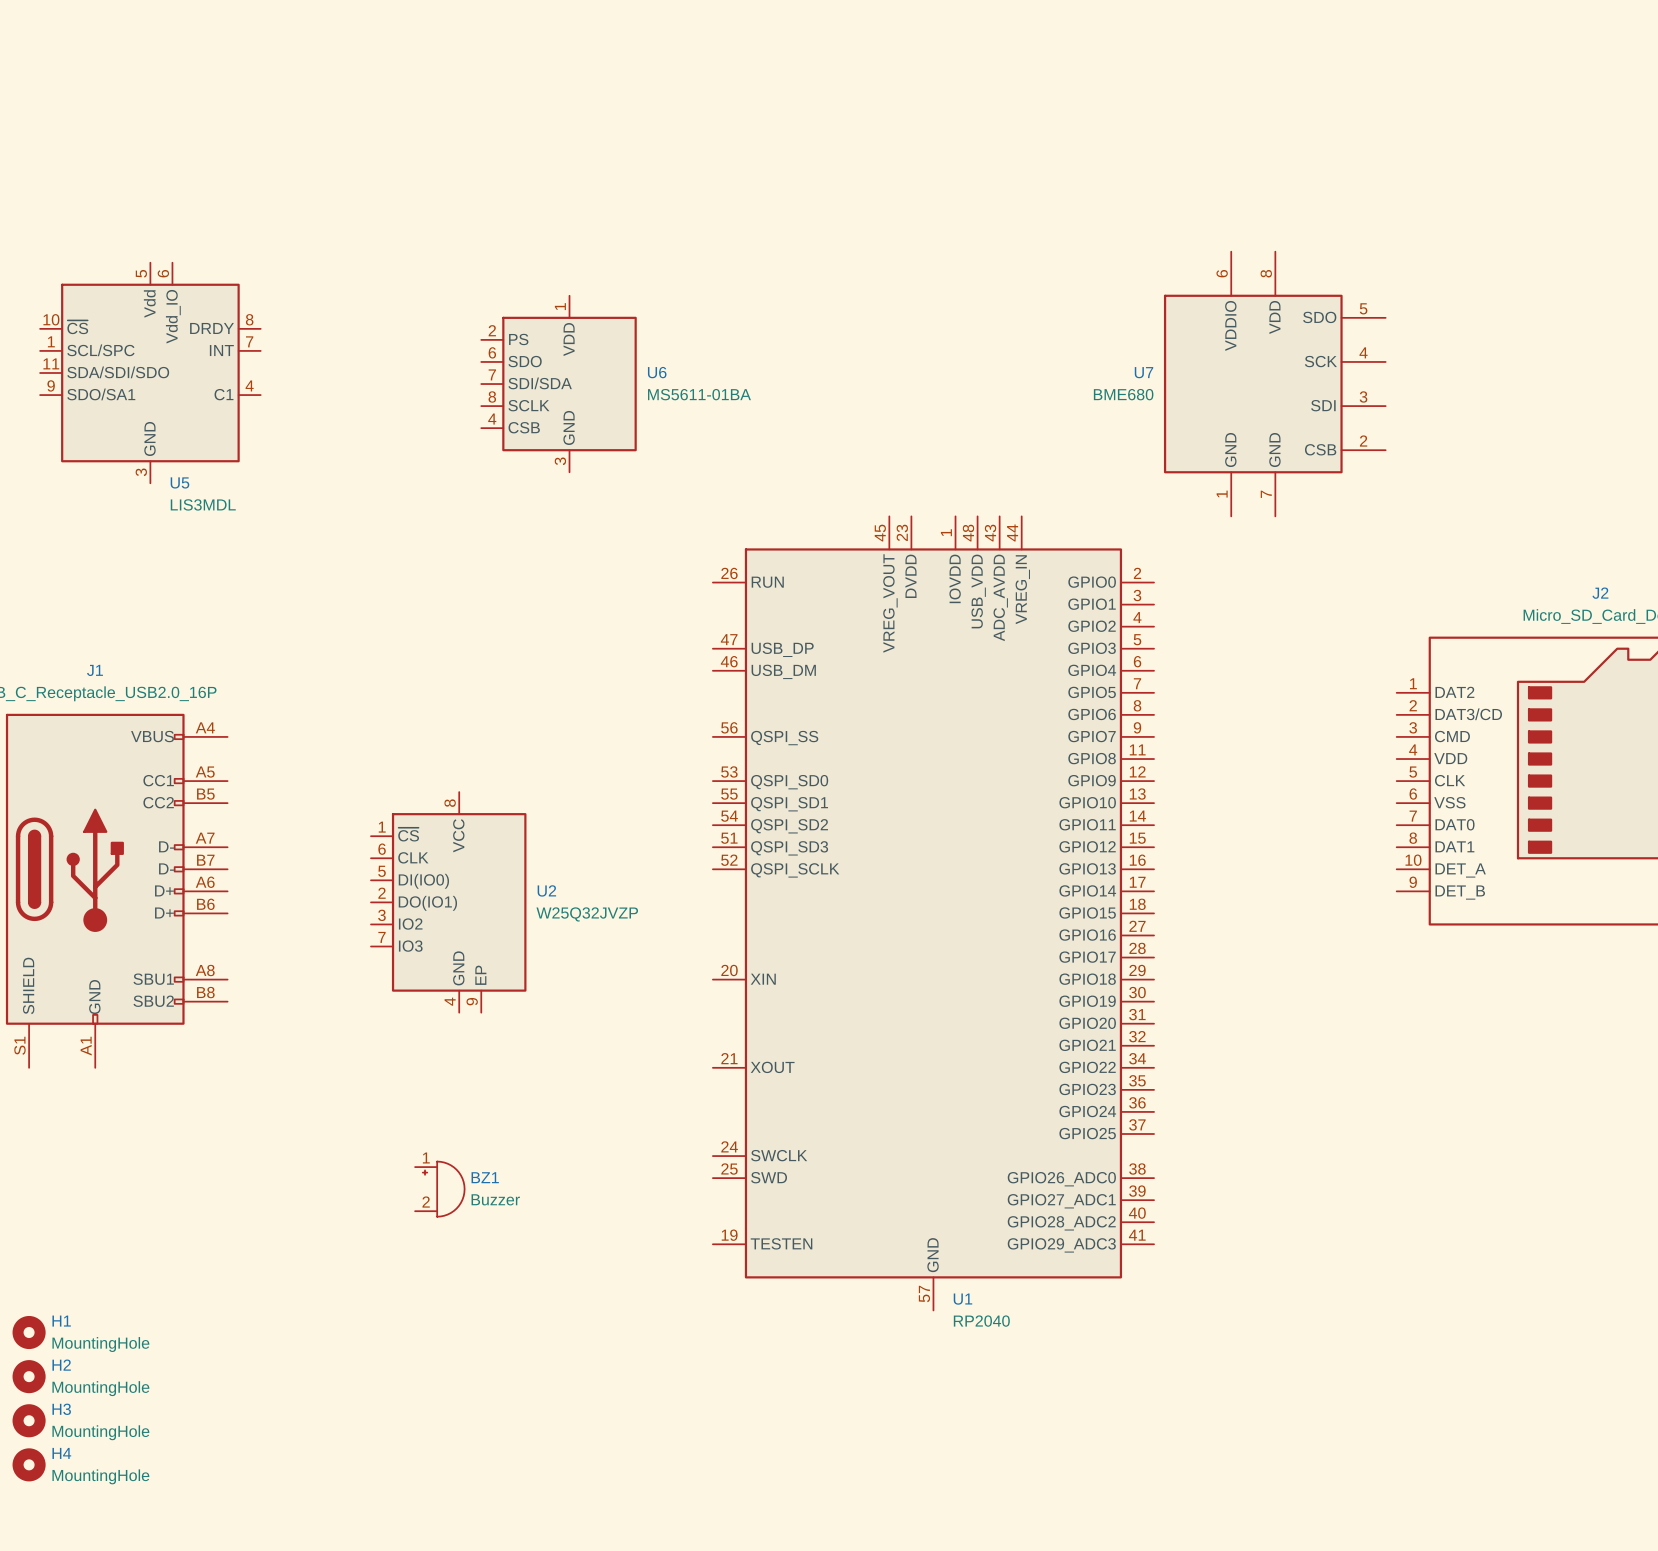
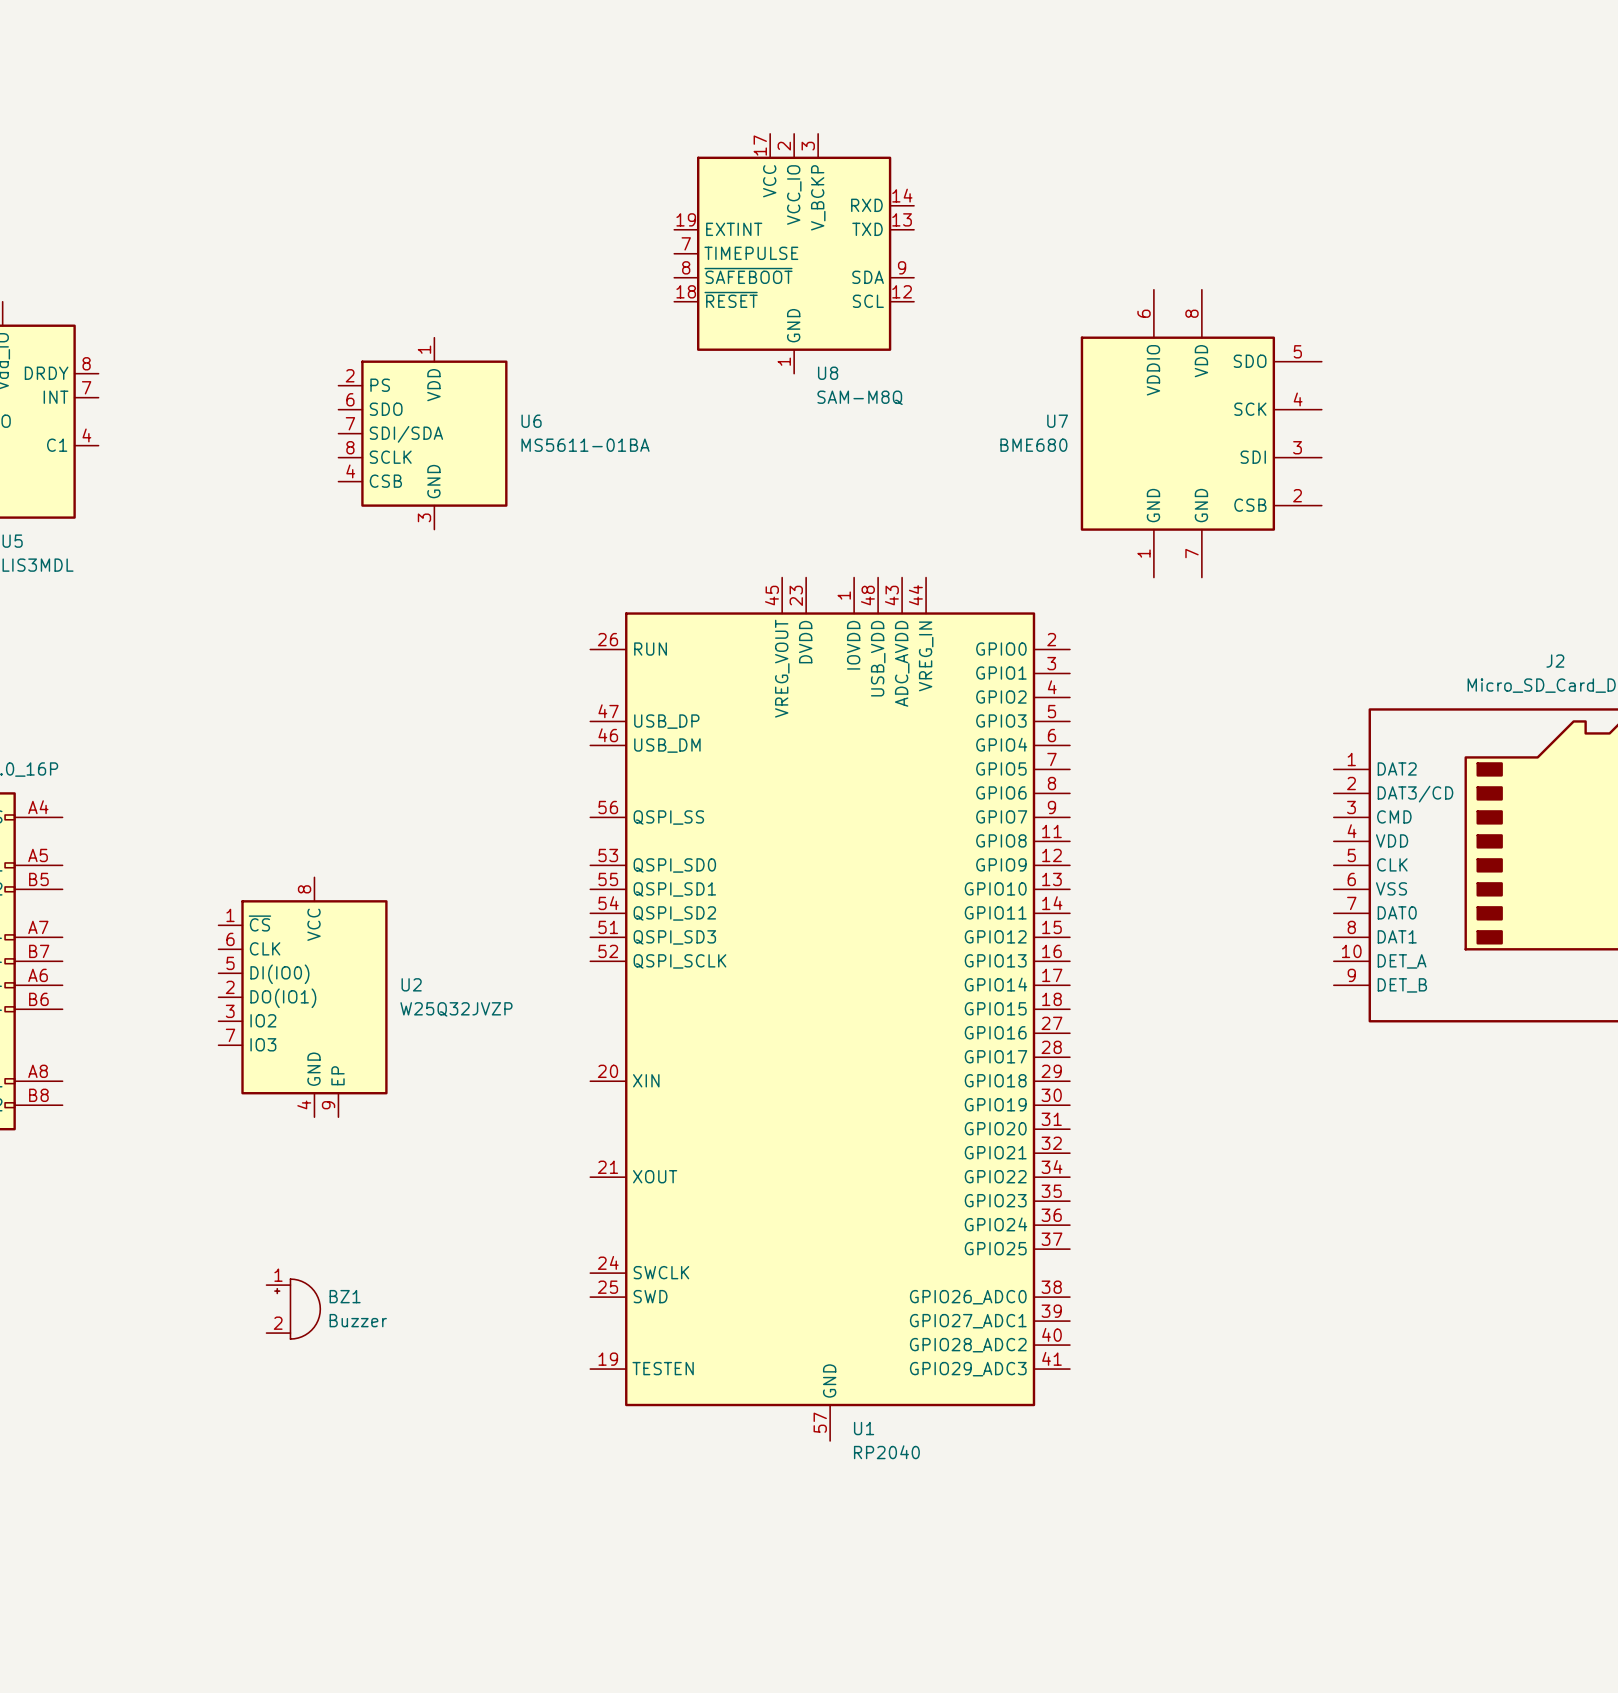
U8: none -> SAM-M8Q (794, 253)

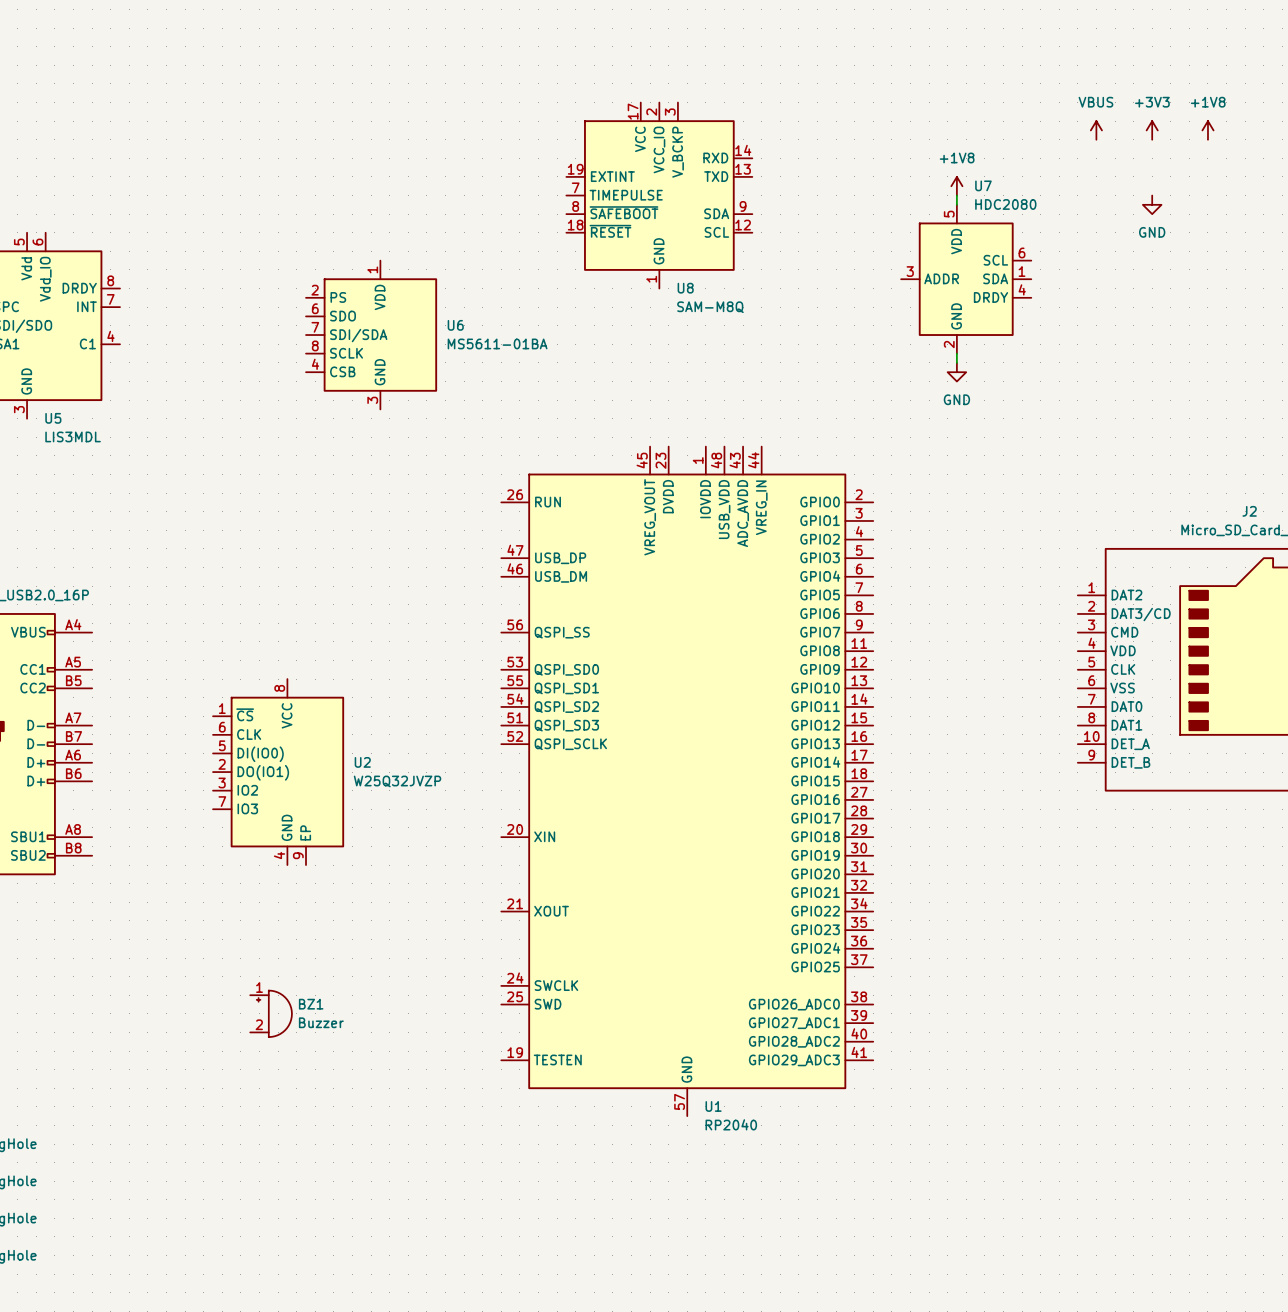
power symbol: none -> VBUS (1096, 130)
power symbol: none -> +3V3 (1152, 130)
power symbol: none -> +1V8 (1207, 130)
power symbol: none -> +1V8 (956, 186)
wire: none -> (956, 195) (956, 204)
power symbol: none -> GND (1152, 204)
U7 symbol: [1080, 289, 1322, 578] -> [901, 204, 1032, 354]
U7 name position: U7 (1057, 421) -> U7 (983, 185)
U7 value: BME680 (1033, 445) -> HDC2080 (1005, 204)
power symbol: none -> GND (956, 372)

